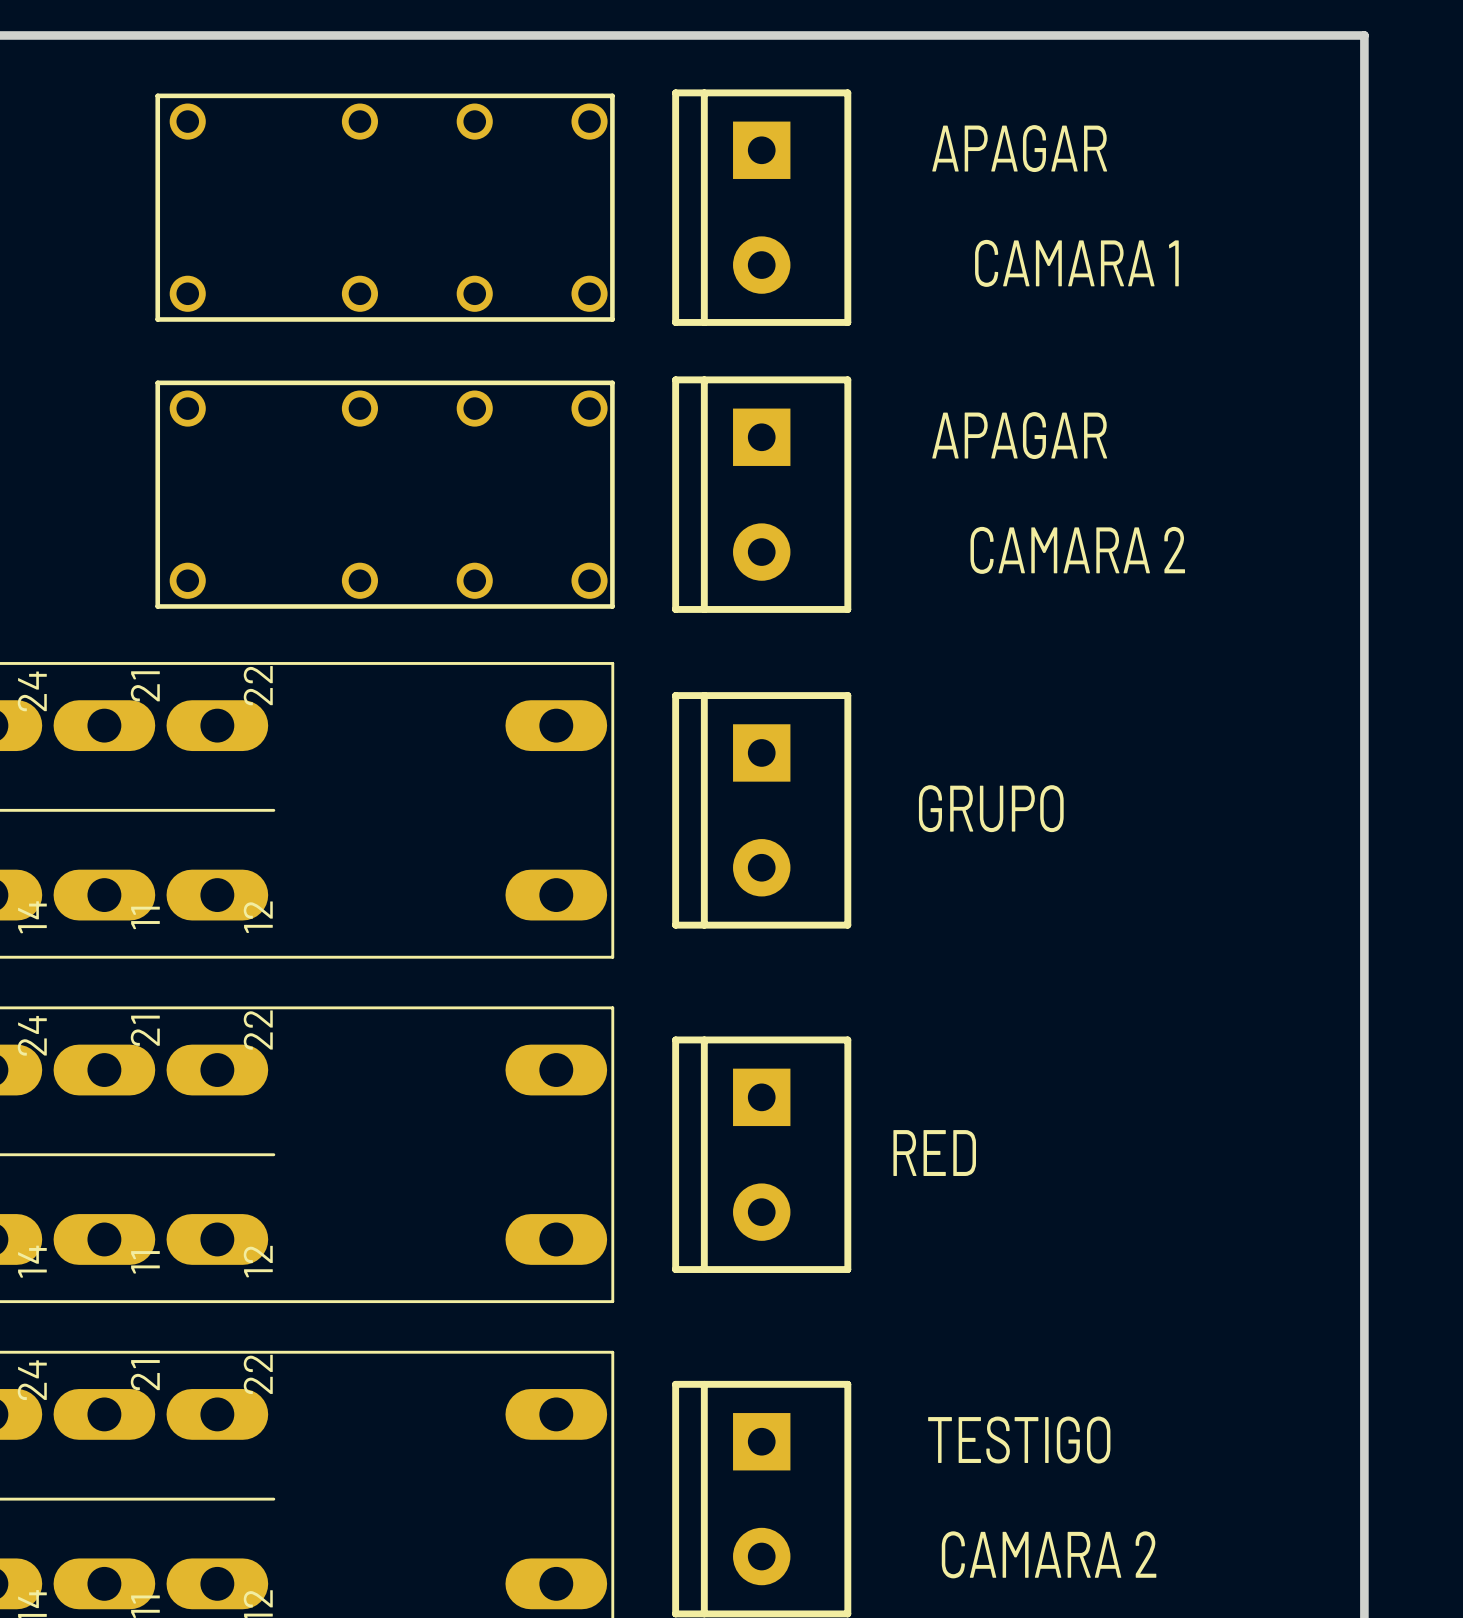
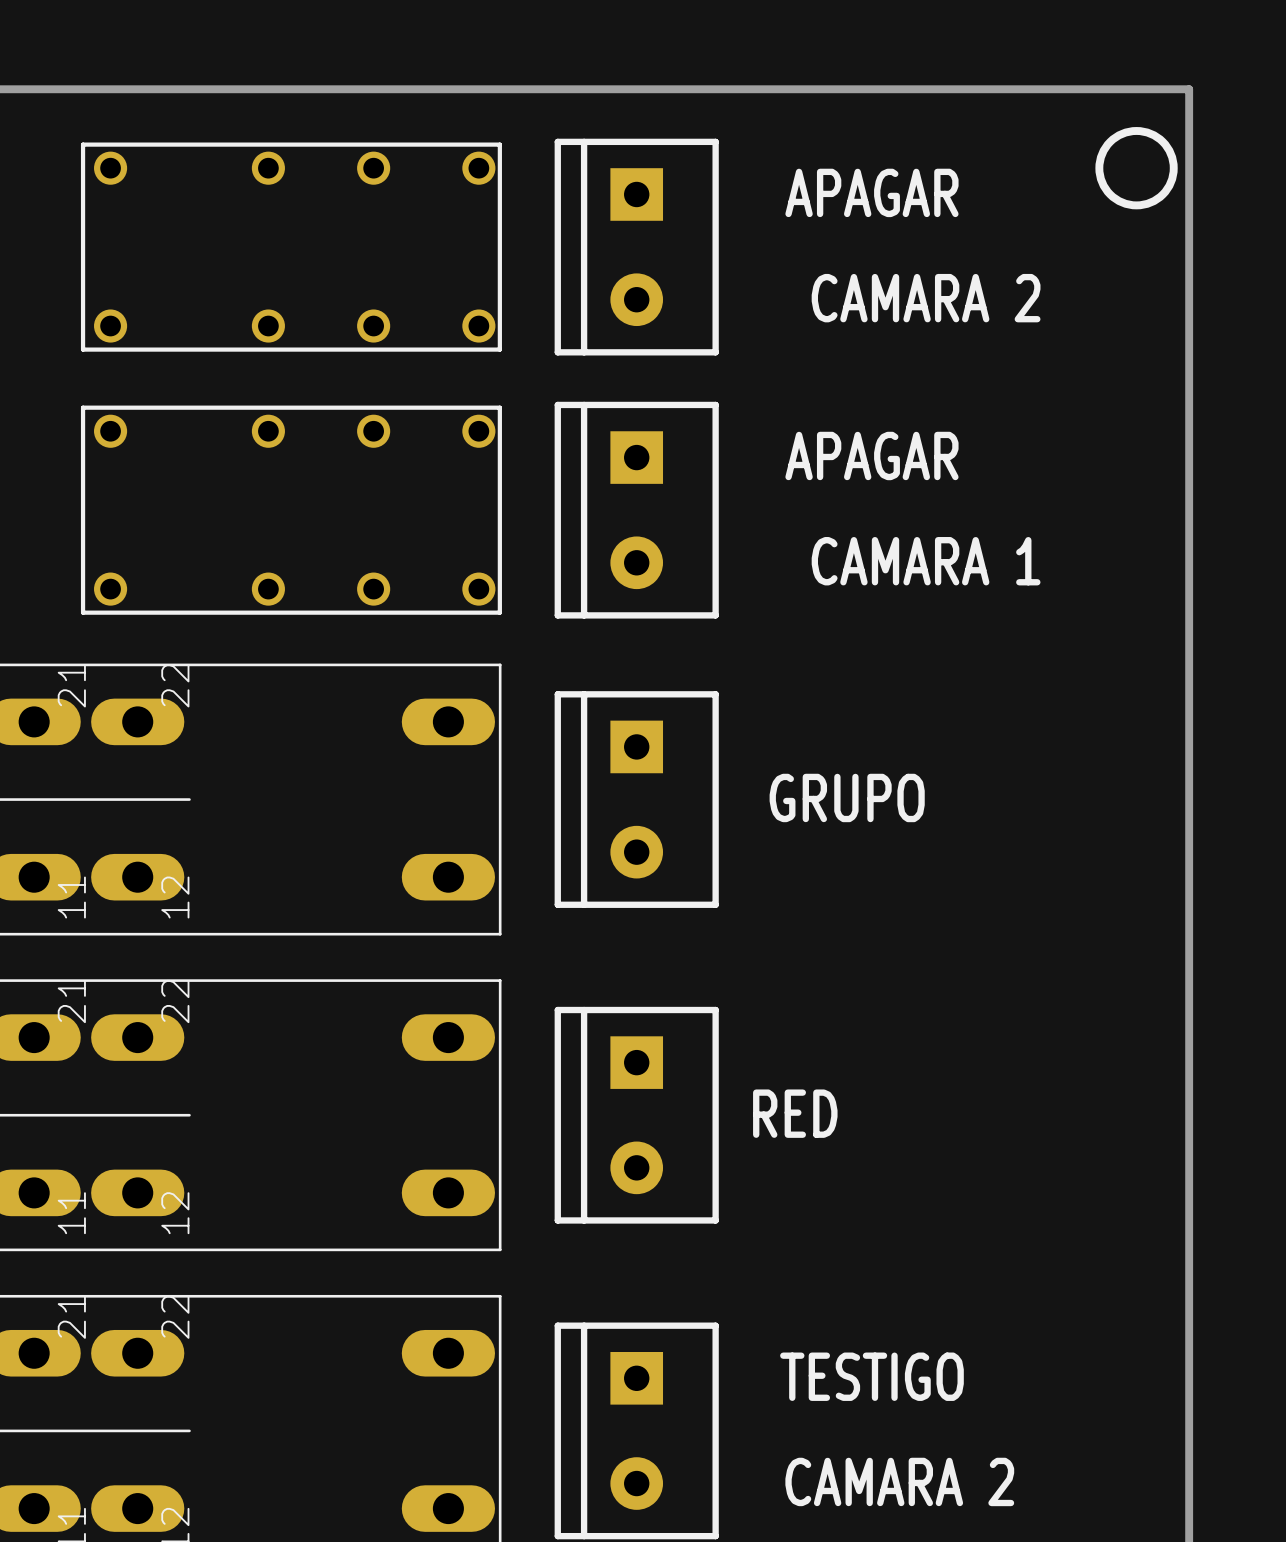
drawing: none -> [1095, 127, 1178, 210]
text: CAMARA 1 (1076, 263) -> CAMARA 2 (926, 298)
text: CAMARA 2 (1077, 550) -> CAMARA 1 (926, 561)

